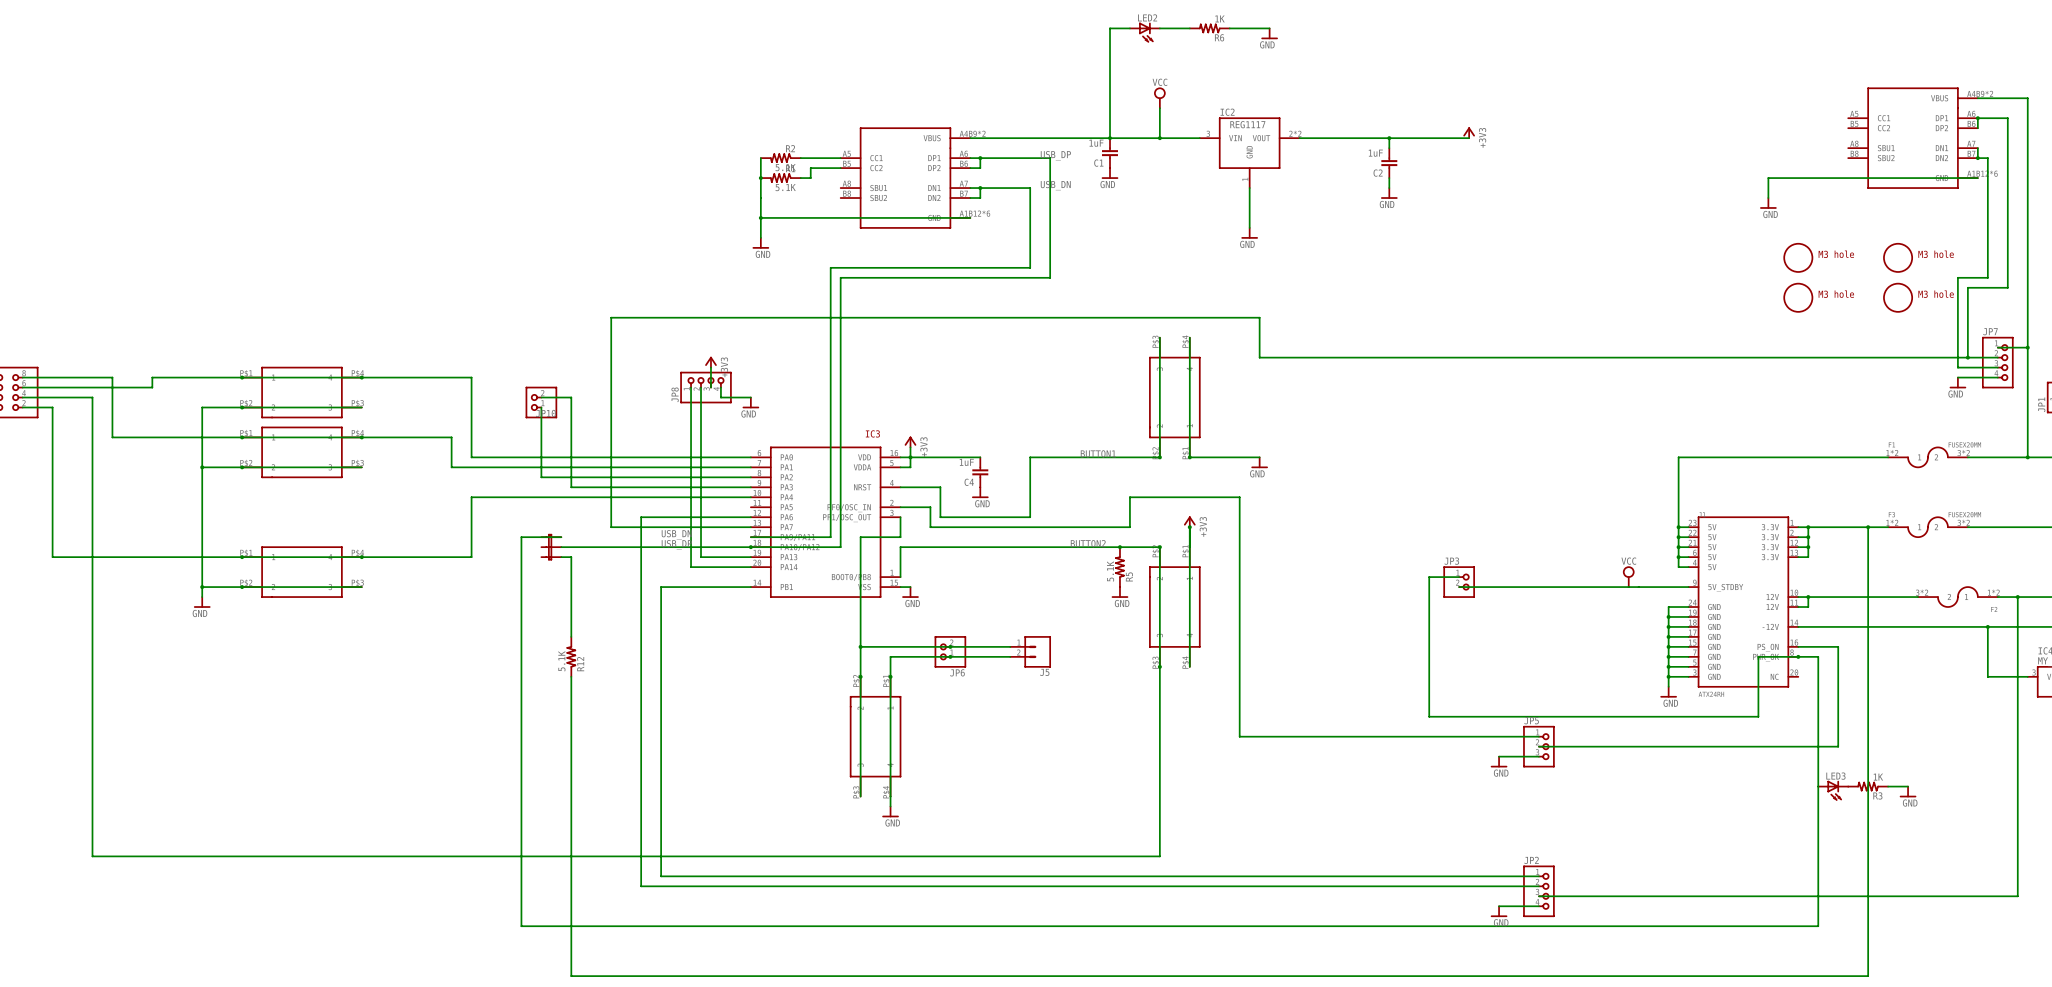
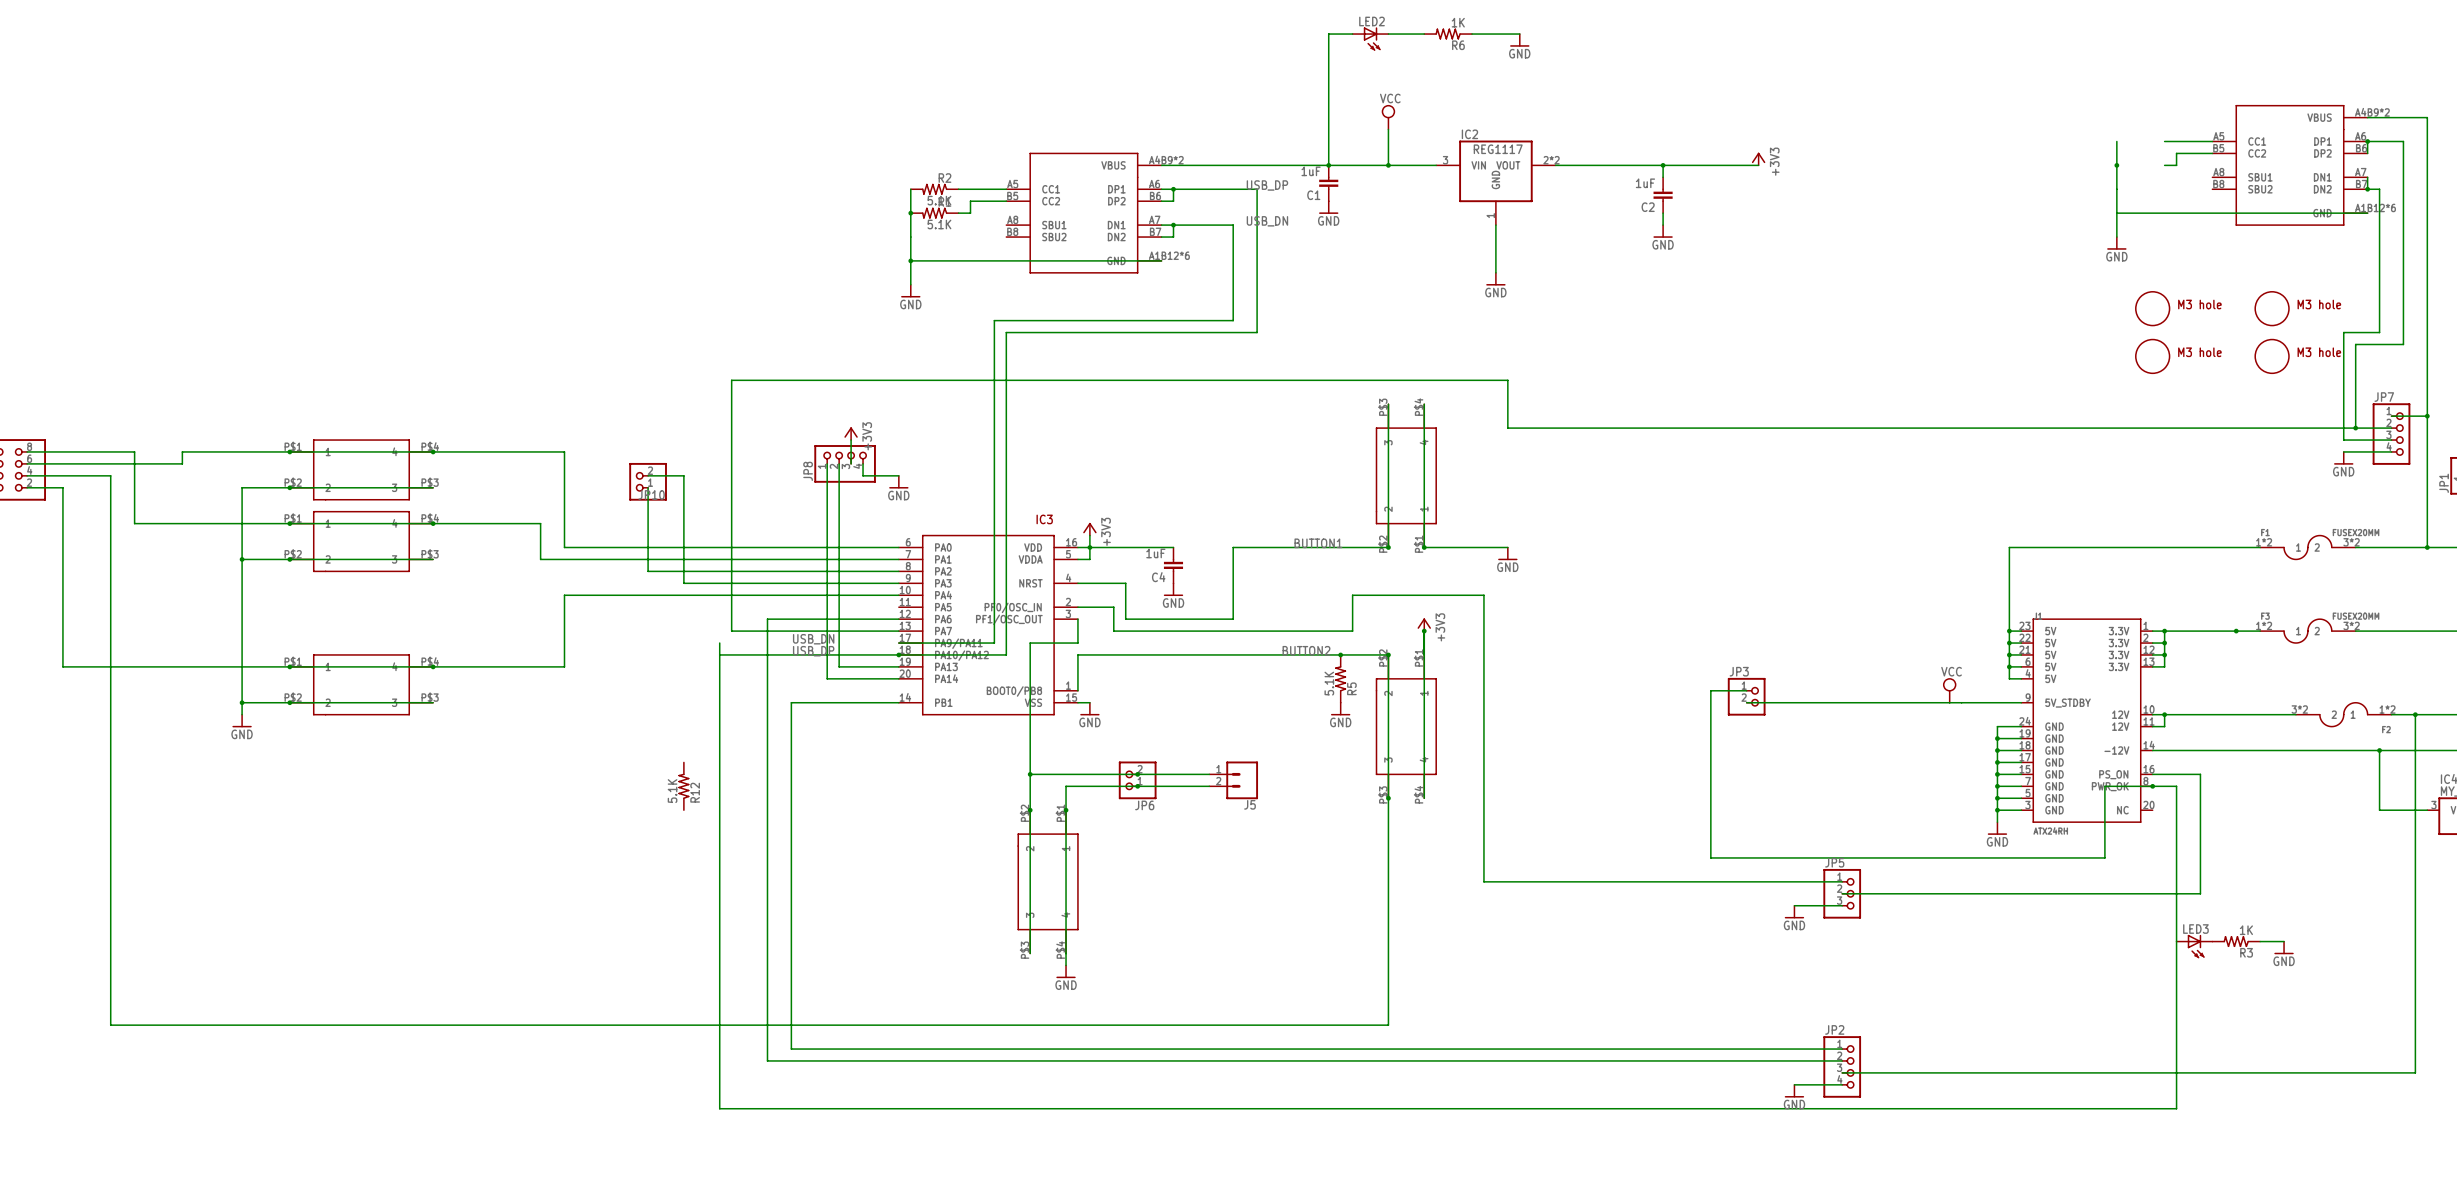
wire: none -> (2116, 141) (2116, 213)
wire: none -> (2164, 141) (2212, 141)
wire: none -> (2212, 153) (2176, 153) (2176, 165) (2164, 165)
junction: none -> (2116, 165)
wire: (1868, 527) (1868, 976) (571, 976) (571, 676) -> none
wire: (561, 537) (521, 537) (521, 926) (601, 926) -> (719, 643) (719, 1108)
part: (550, 547) -> none
wire: (561, 547) (601, 547) -> none
wire: (561, 557) (571, 557) (571, 636) -> none

